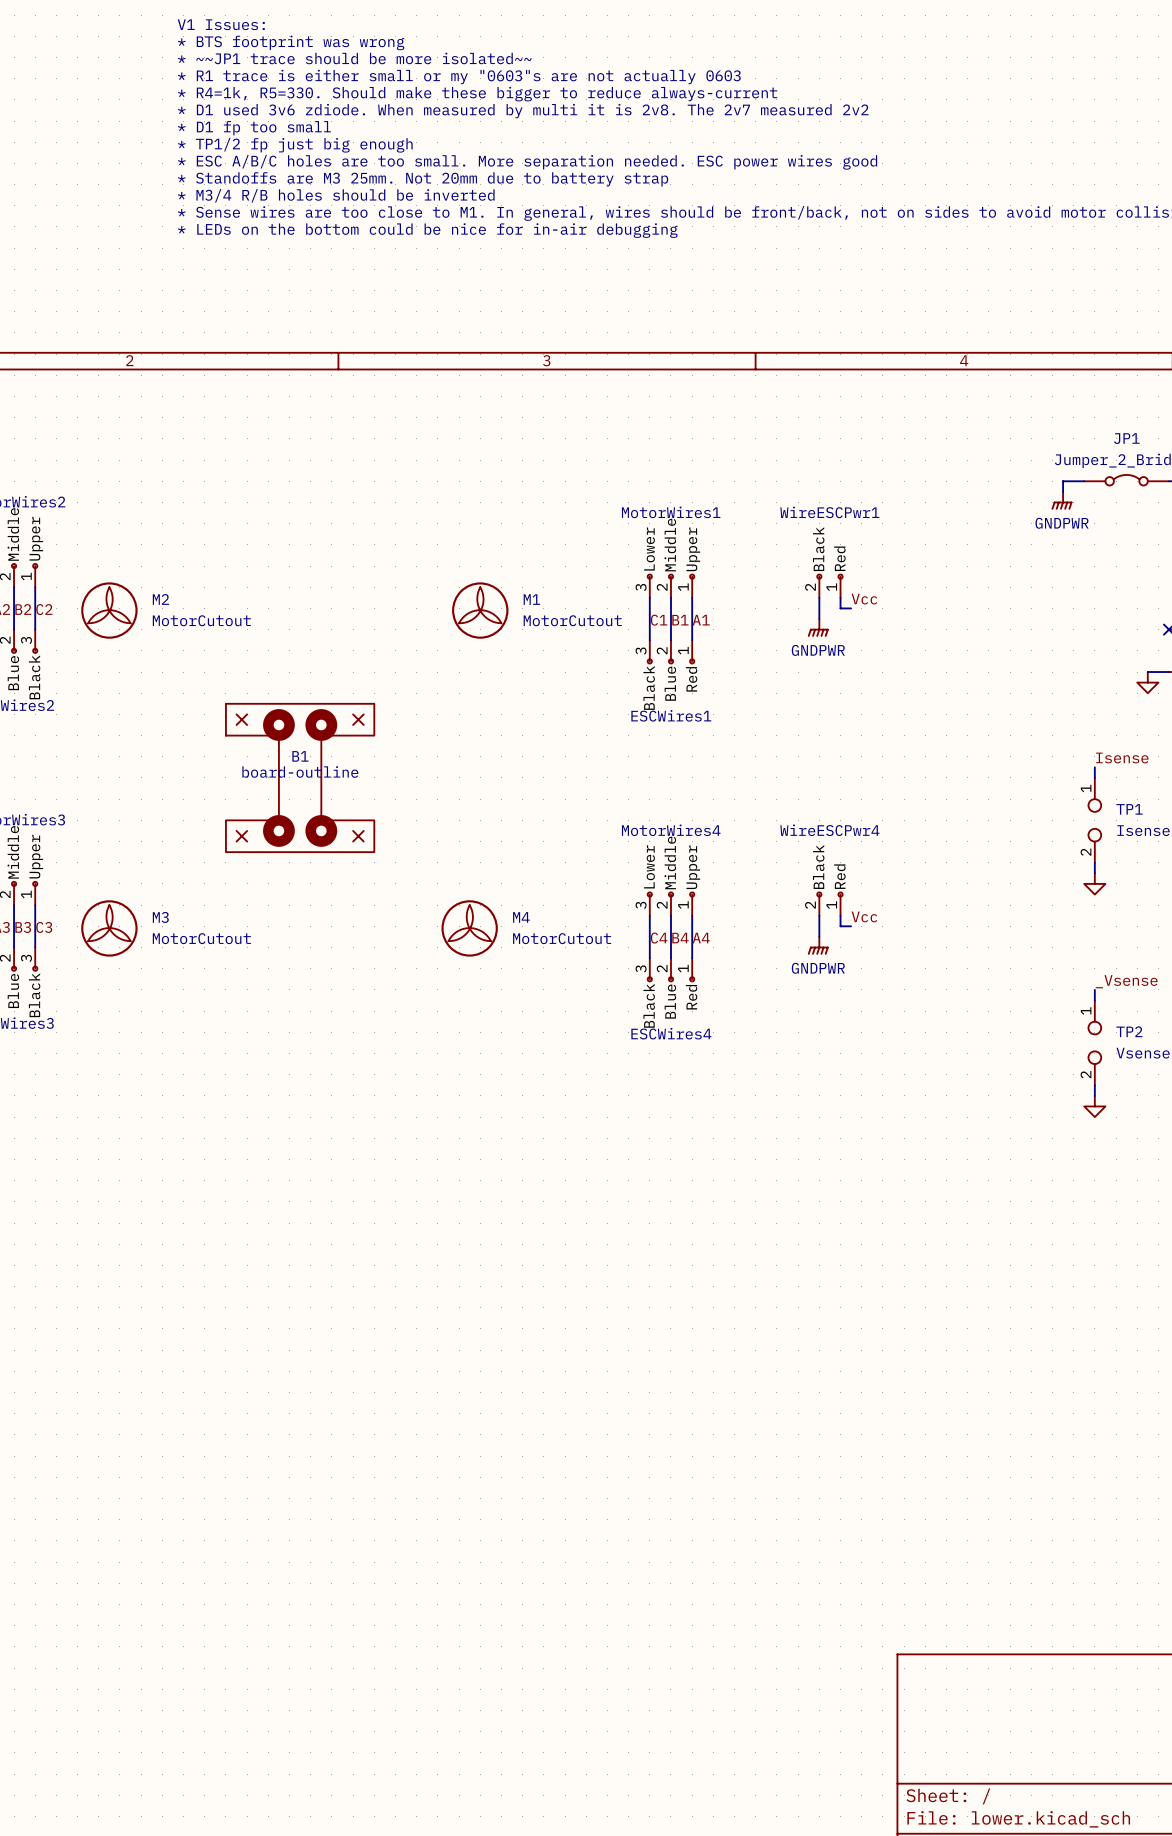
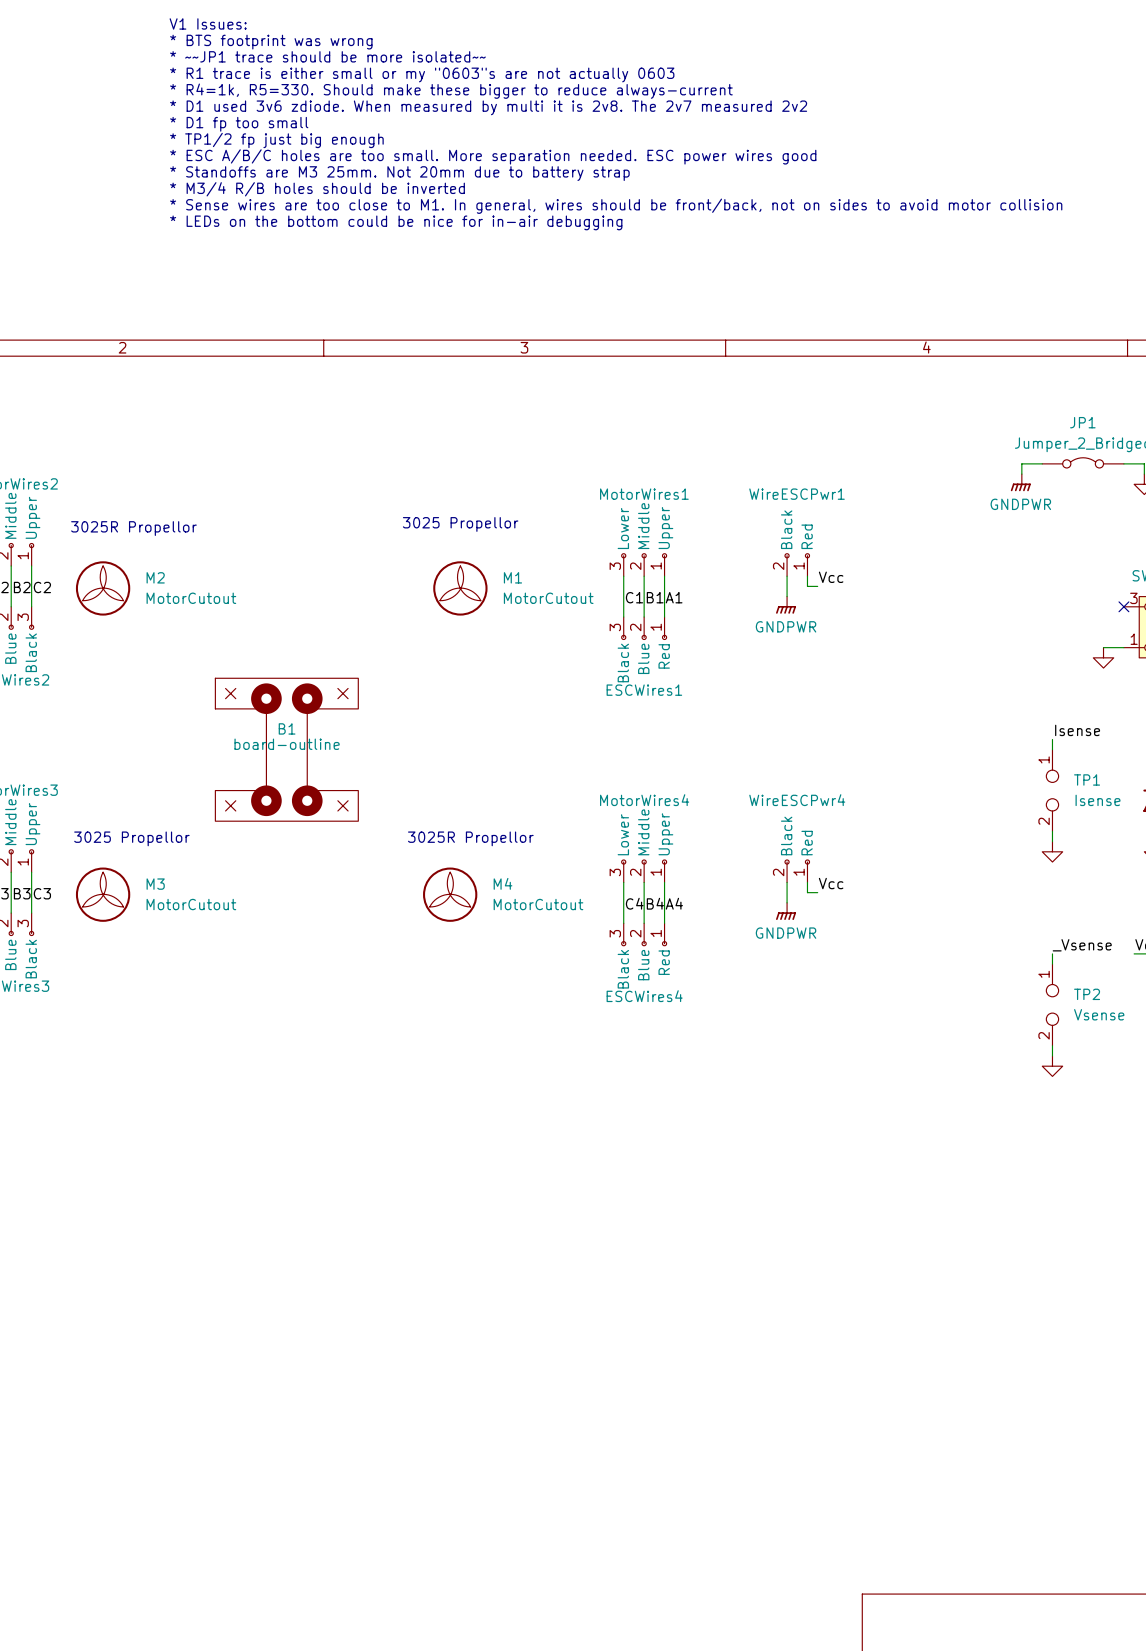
text: none -> 3025 Propellor (460, 524)
text: none -> 3025R Propellor (133, 528)
text: none -> 3025 Propellor (131, 838)
text: none -> 3025R Propellor (470, 838)

